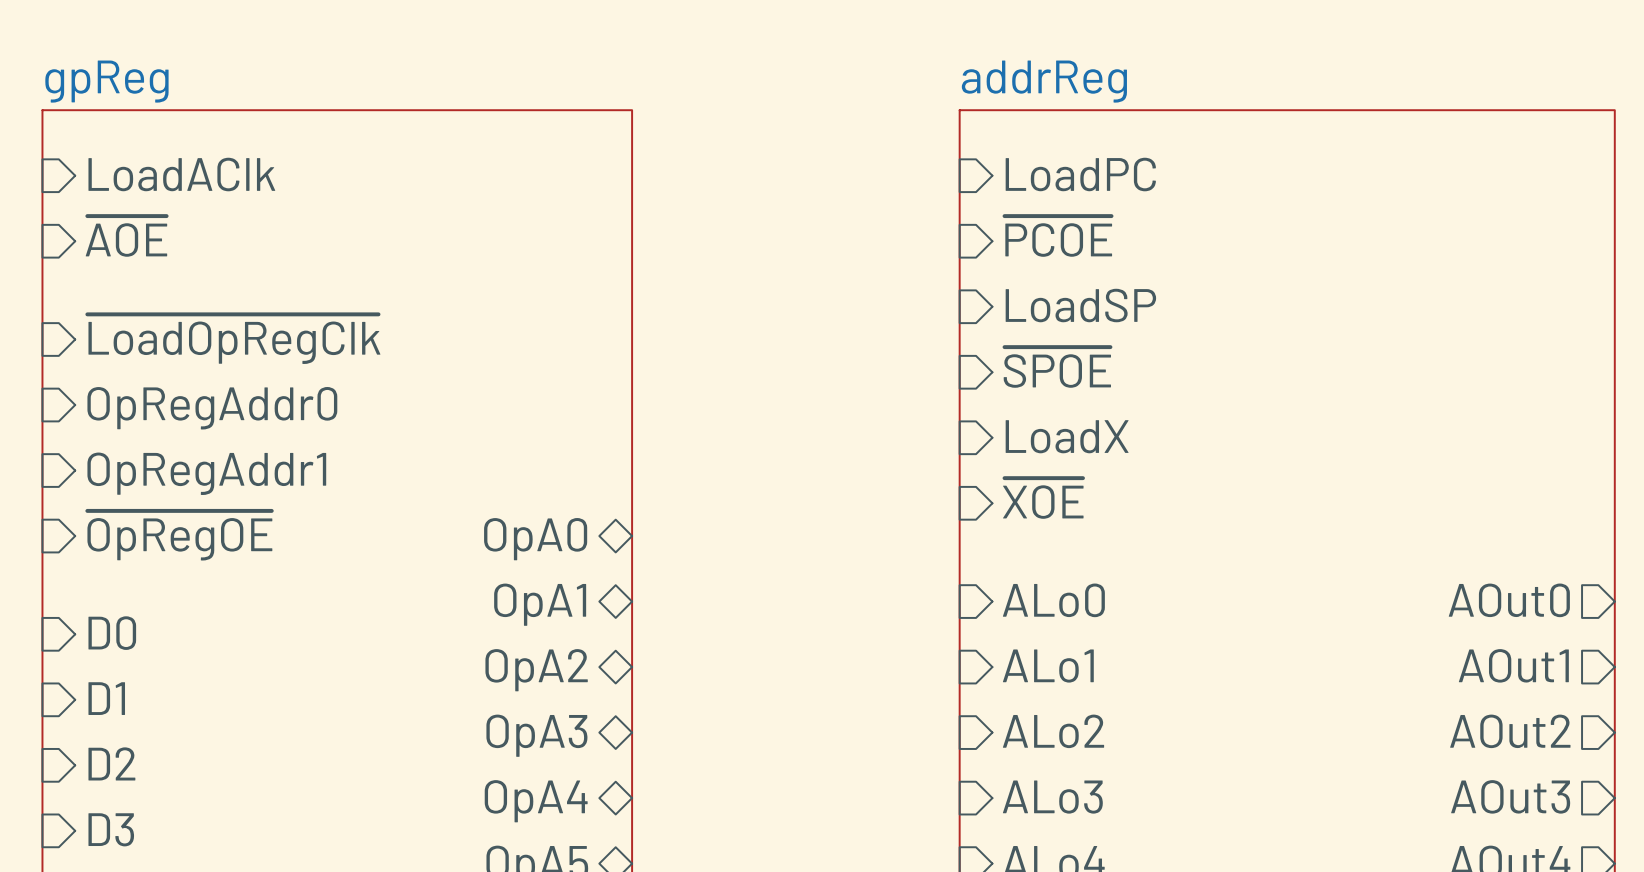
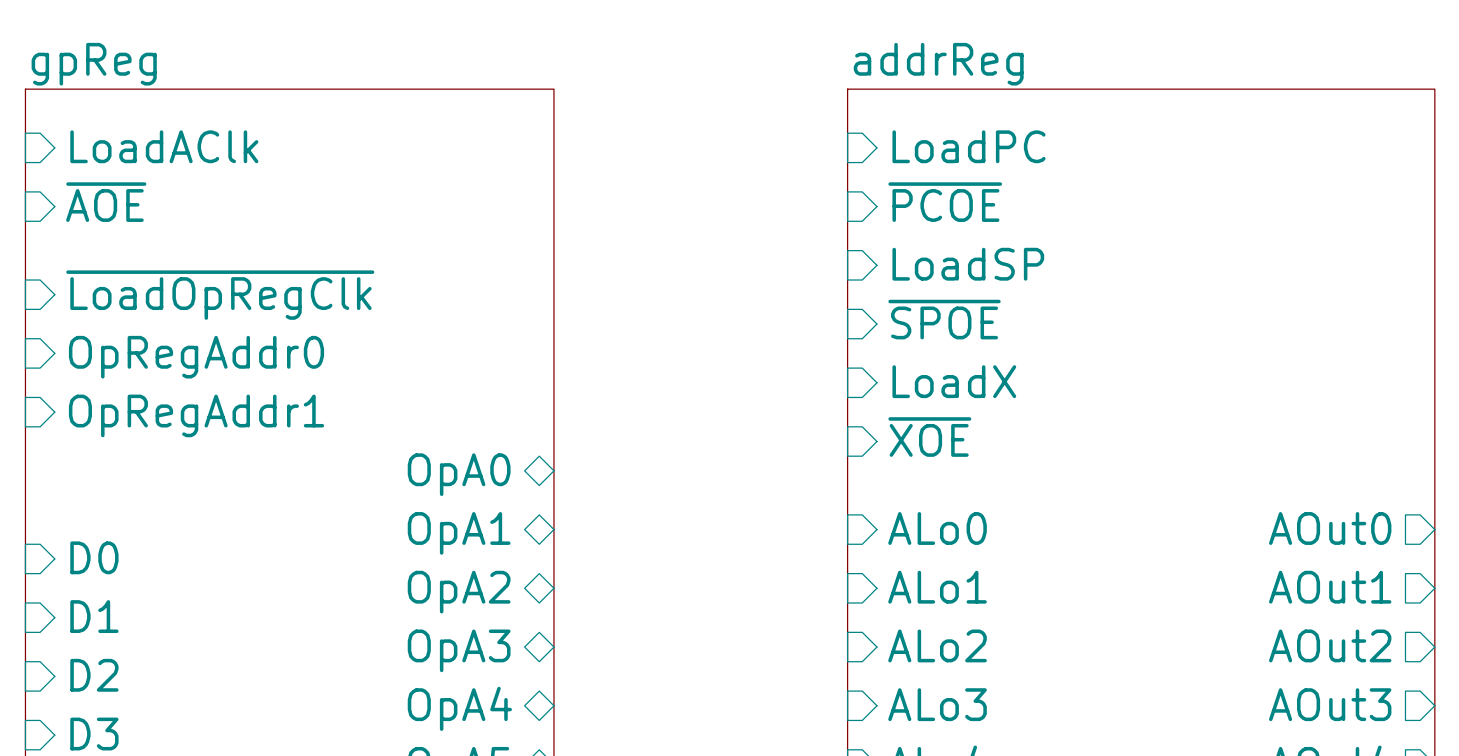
sheet pin: ~{OpRegOE} (179, 535) -> none

